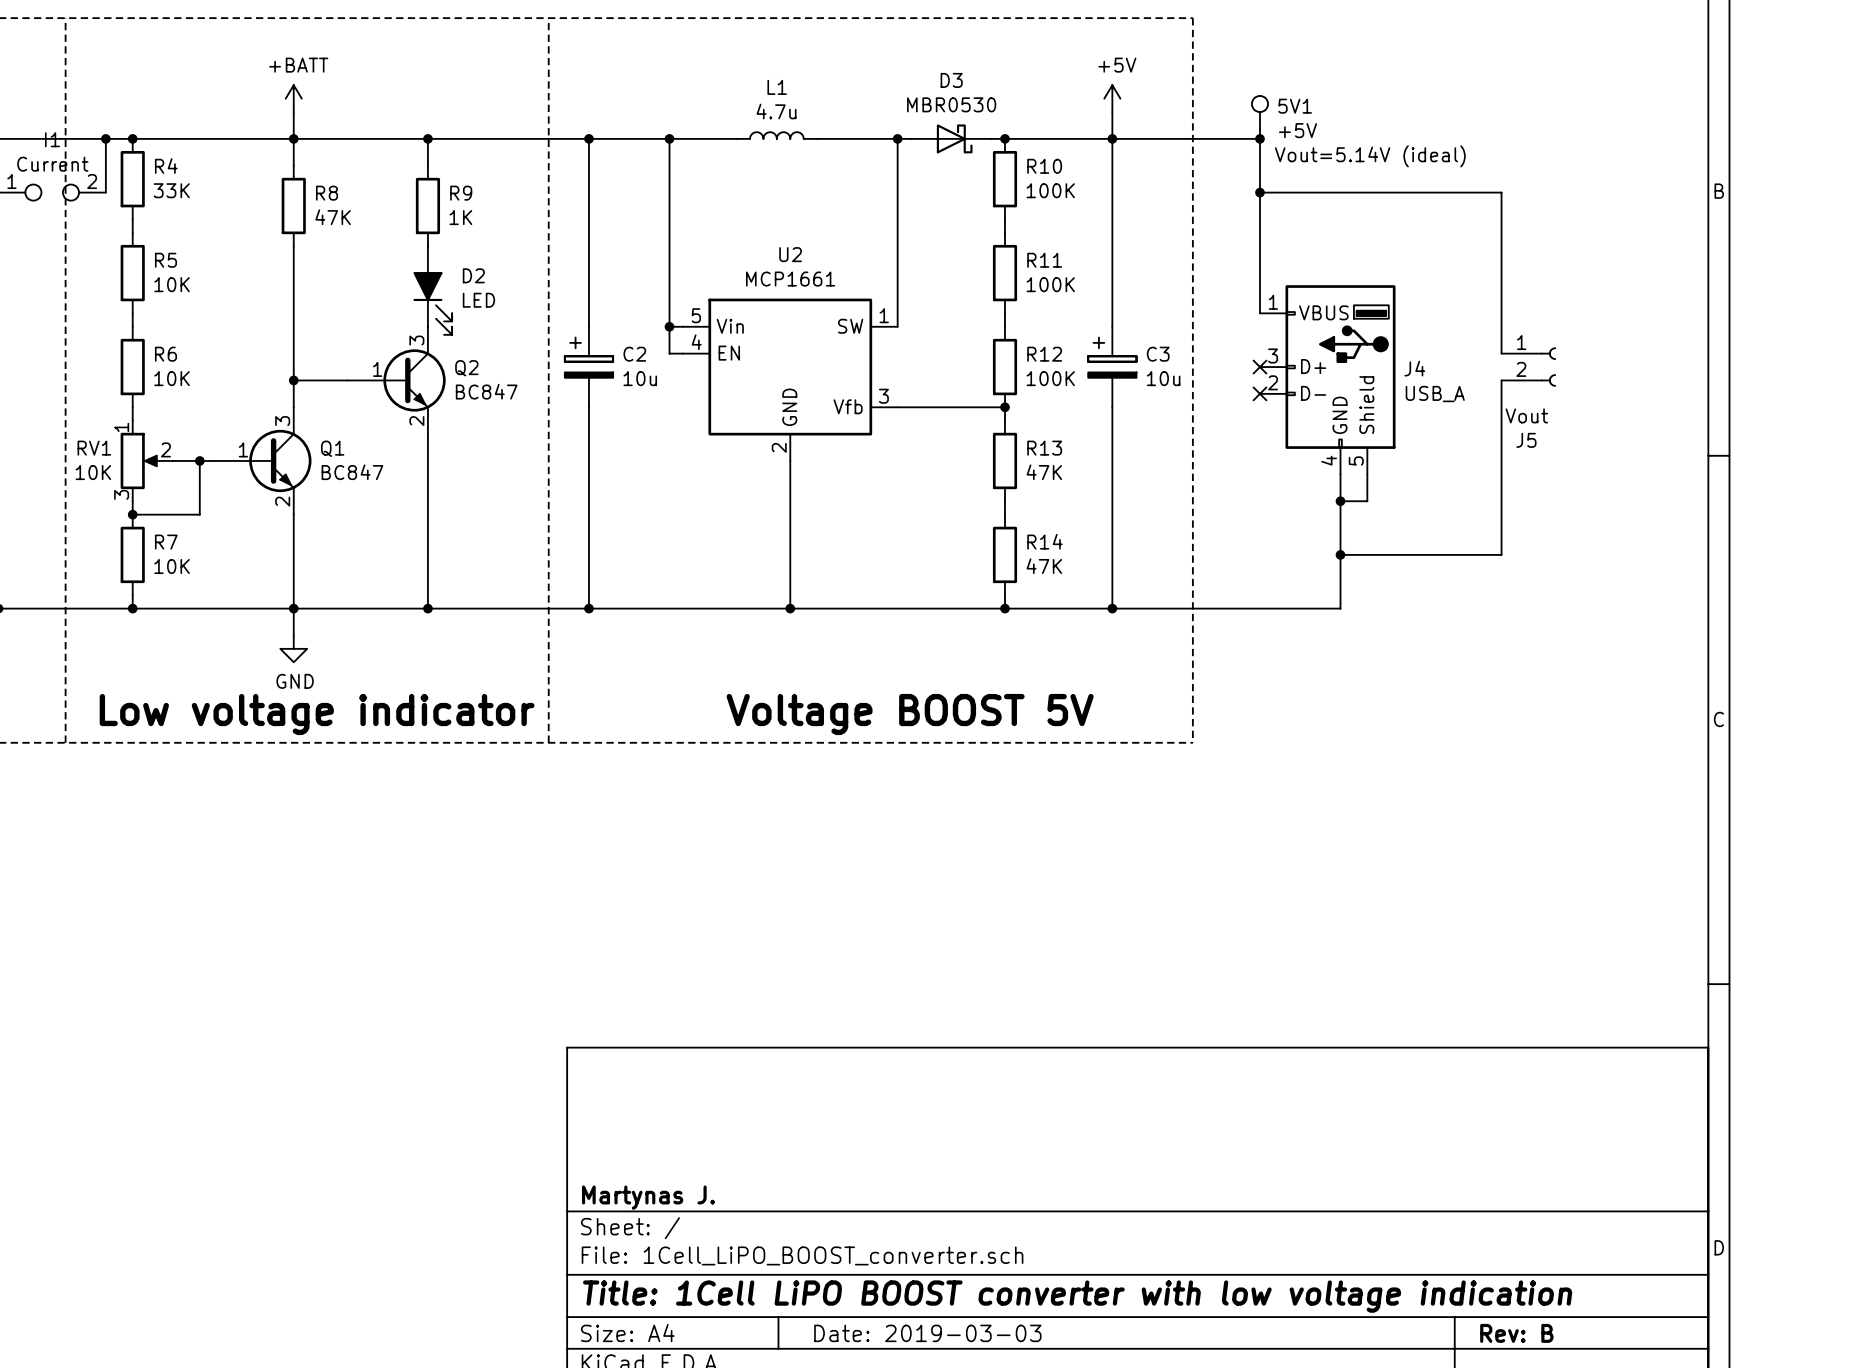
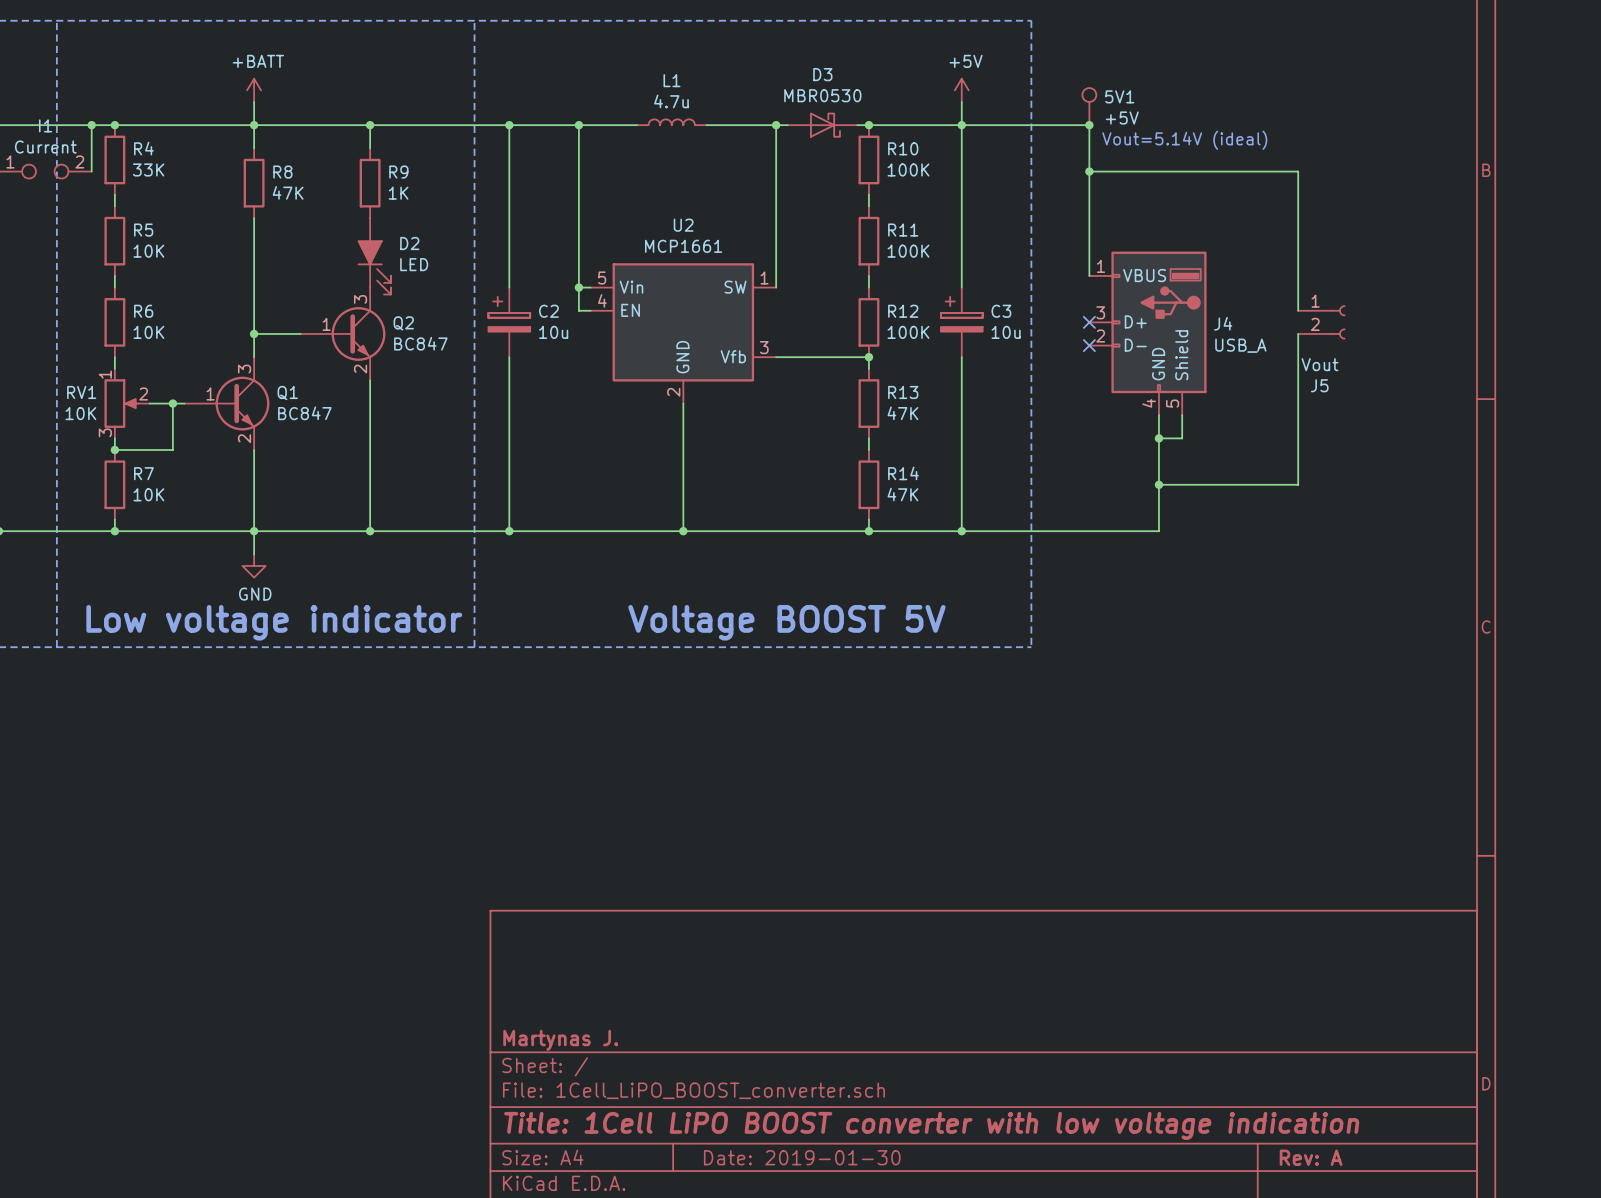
title block: Date: 2019-03-03 (927, 1333) -> Date: 2019-01-30 (802, 1157)
title block: Rev: B (1516, 1333) -> Rev: A (1311, 1157)

